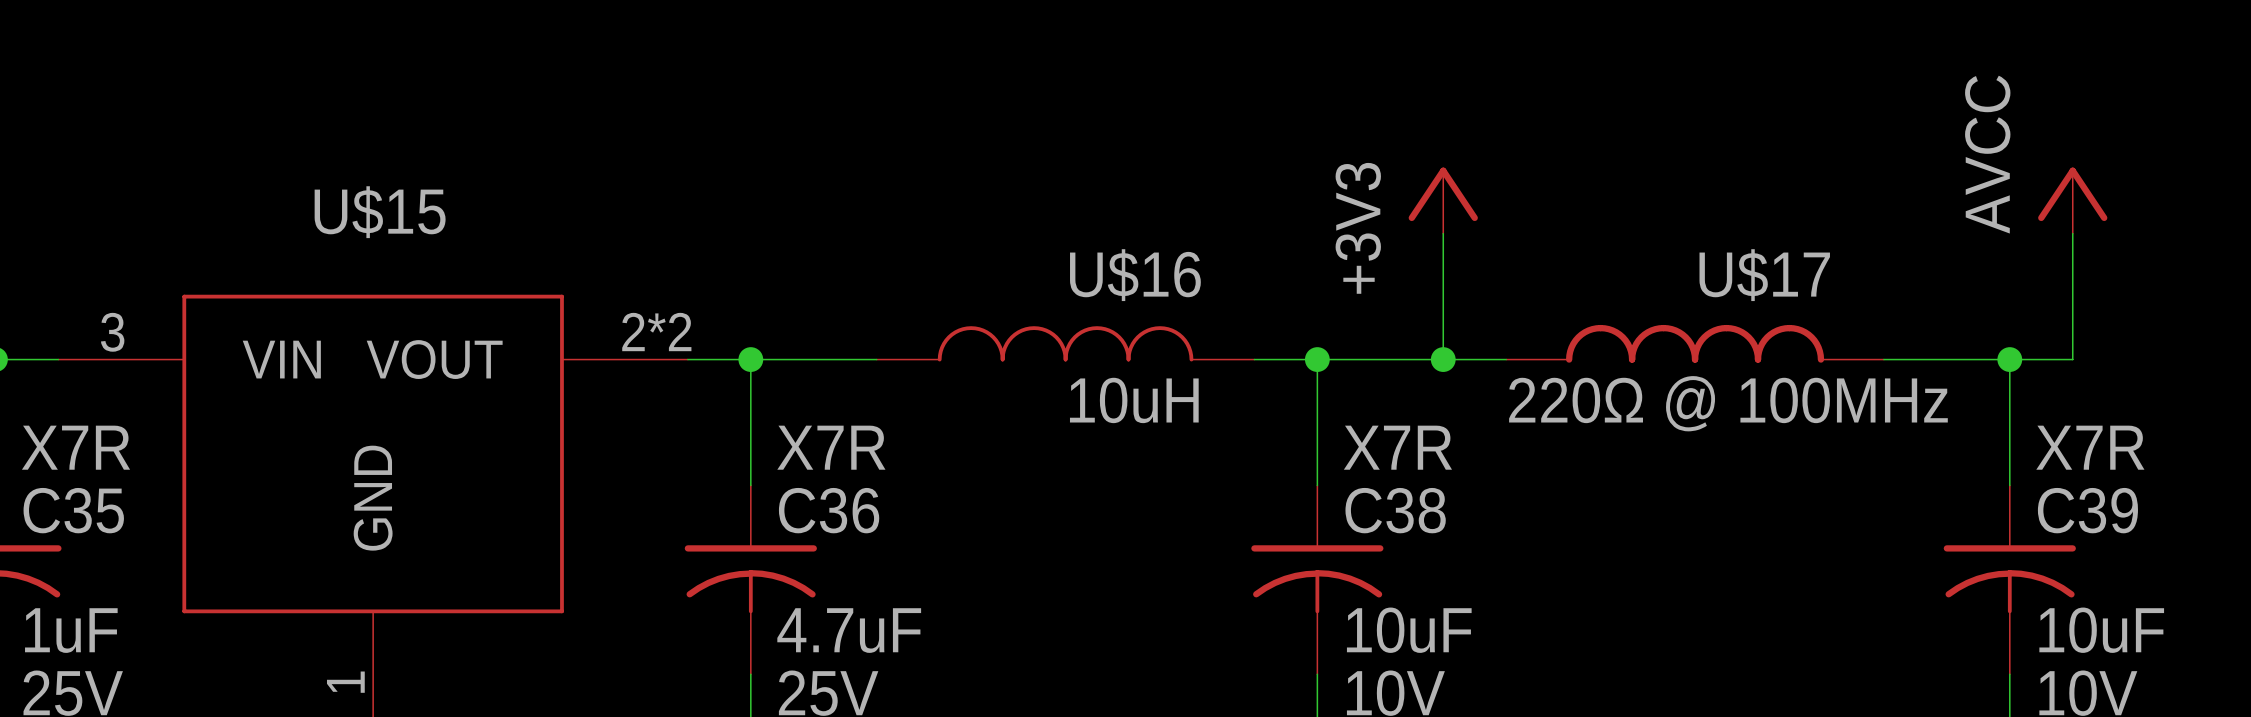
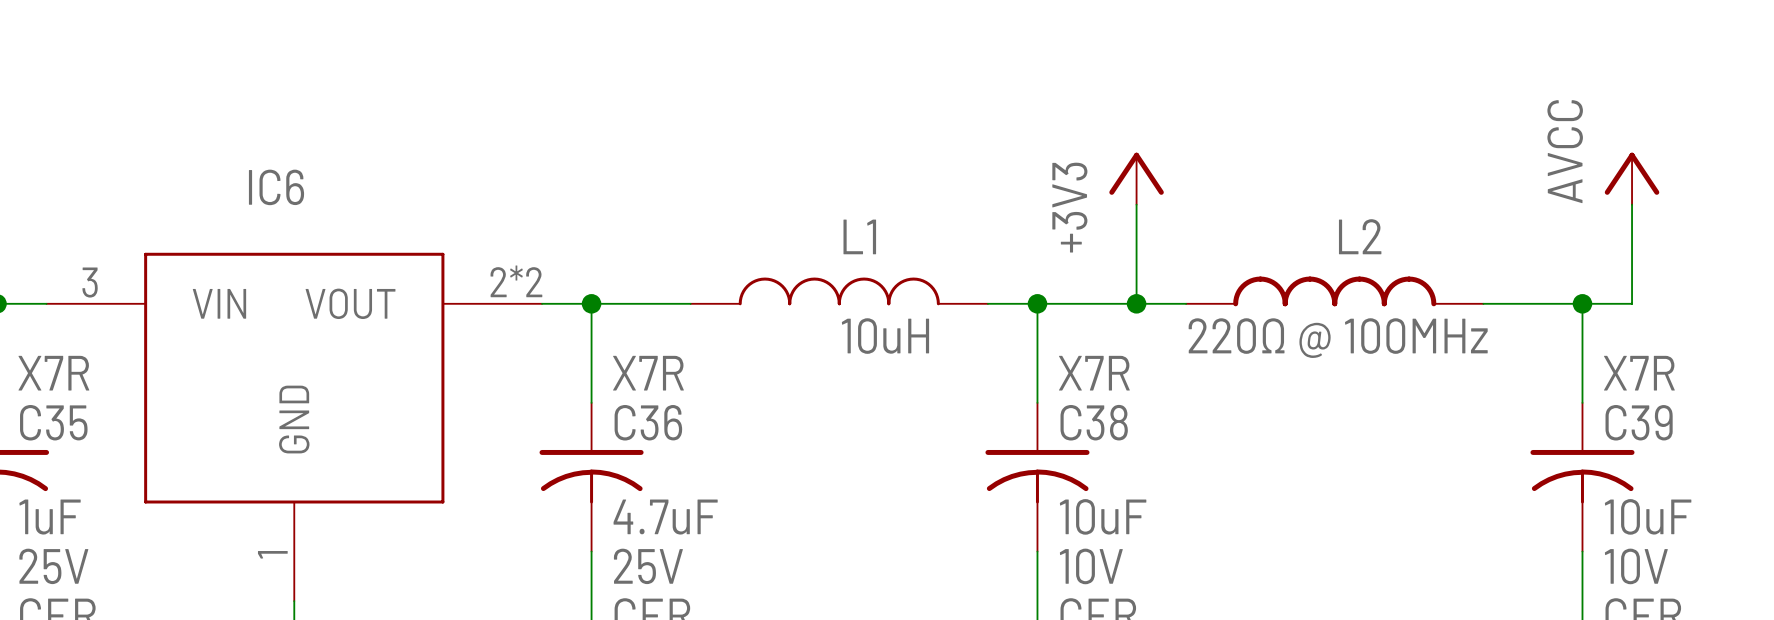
U$15 name: U$15 (380, 212) -> IC6 (276, 187)
U$16 name: U$16 (1135, 275) -> L1 (859, 236)
U$17 name: U$17 (1764, 275) -> L2 (1360, 236)

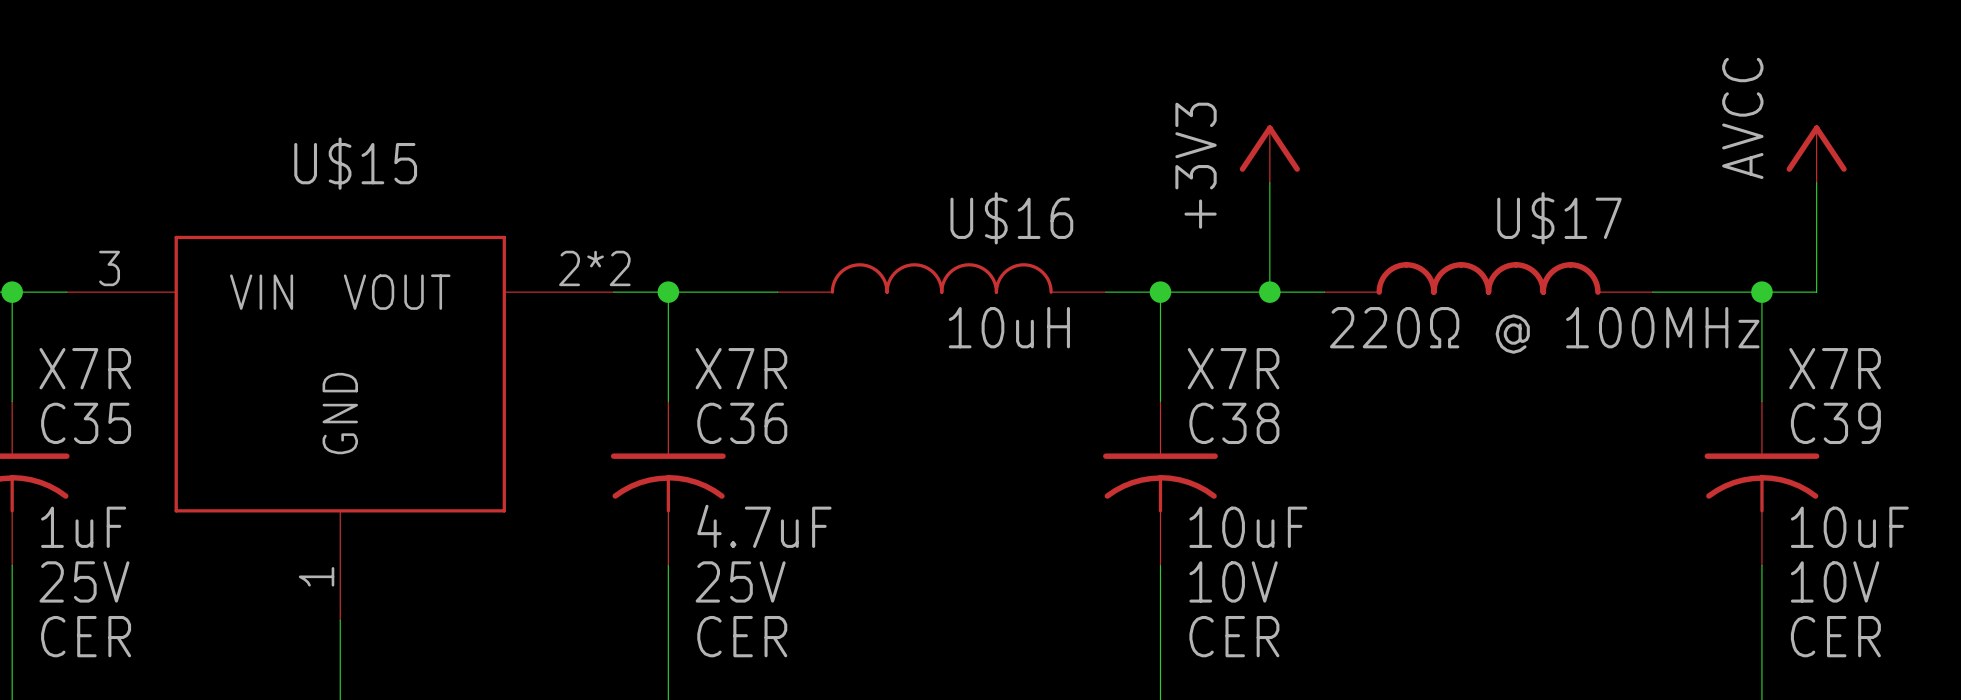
IC6 name: IC6 (276, 187) -> U$15 (355, 163)
L1 name: L1 (859, 236) -> U$16 (1011, 218)
L2 name: L2 (1360, 236) -> U$17 (1559, 218)

